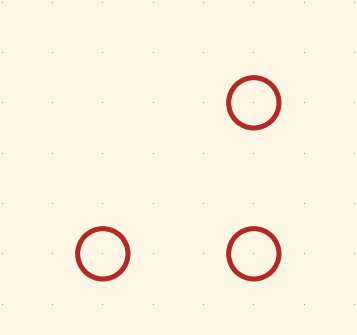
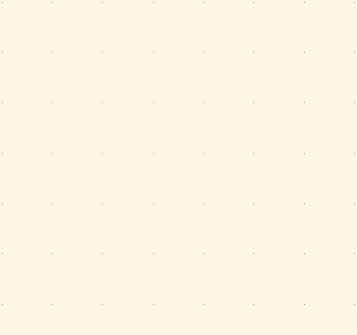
part: (253, 102) -> none
part: (102, 253) -> none
part: (253, 253) -> none

